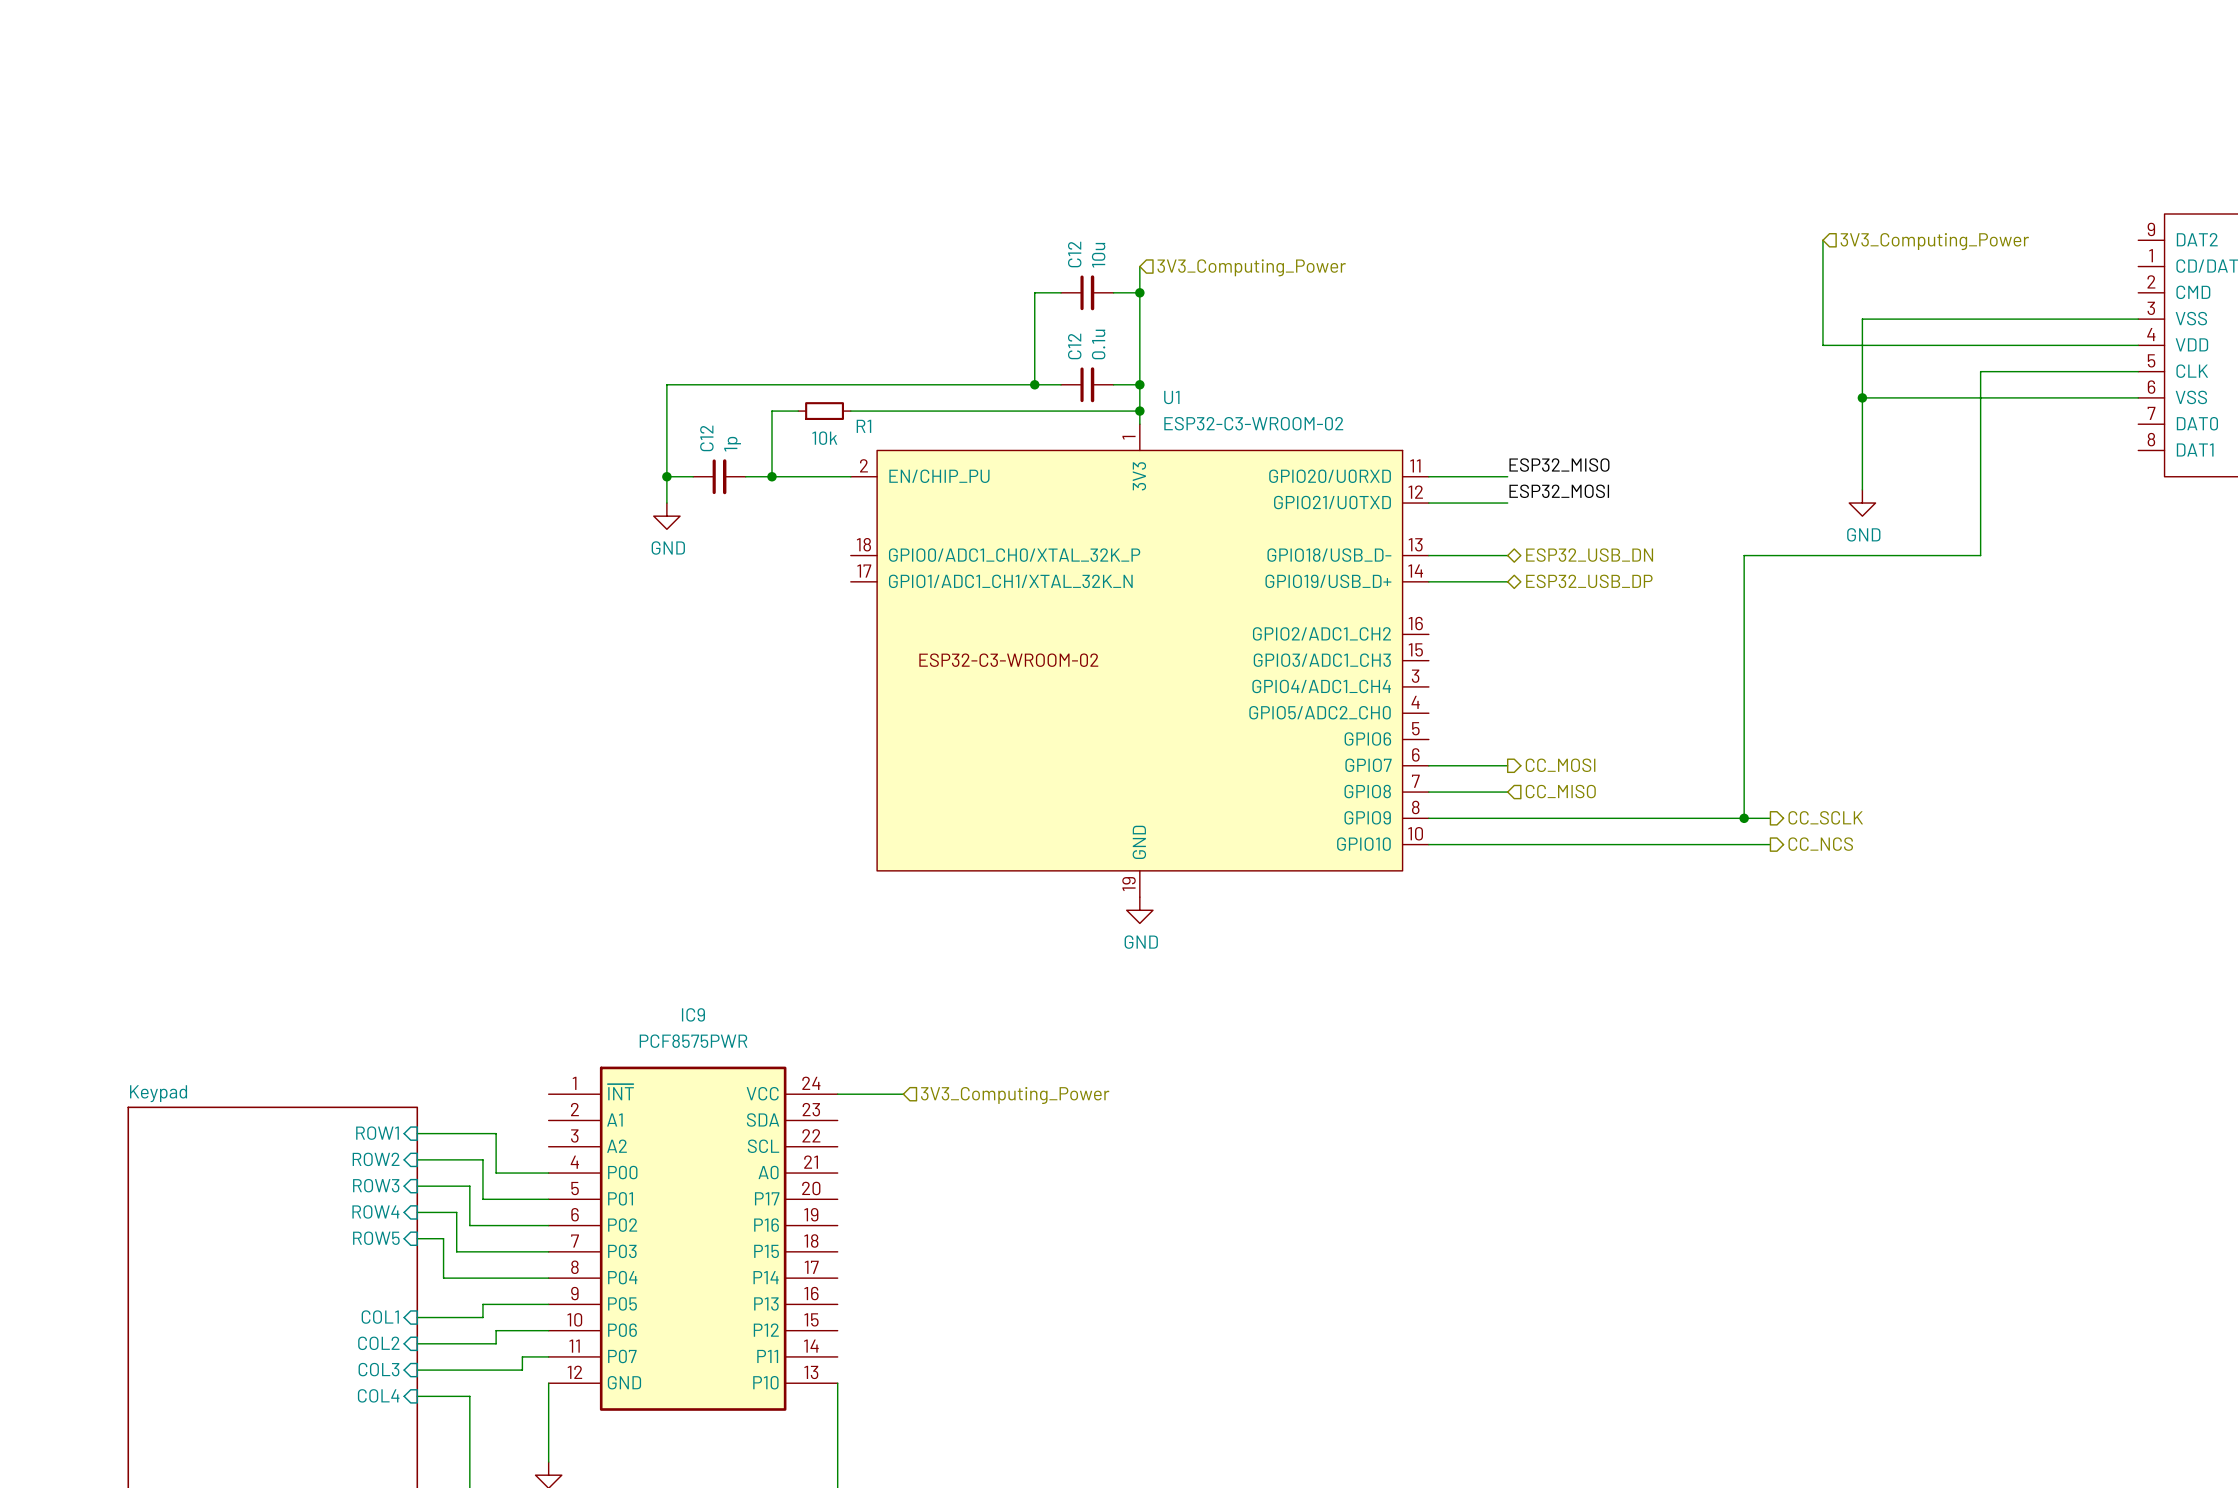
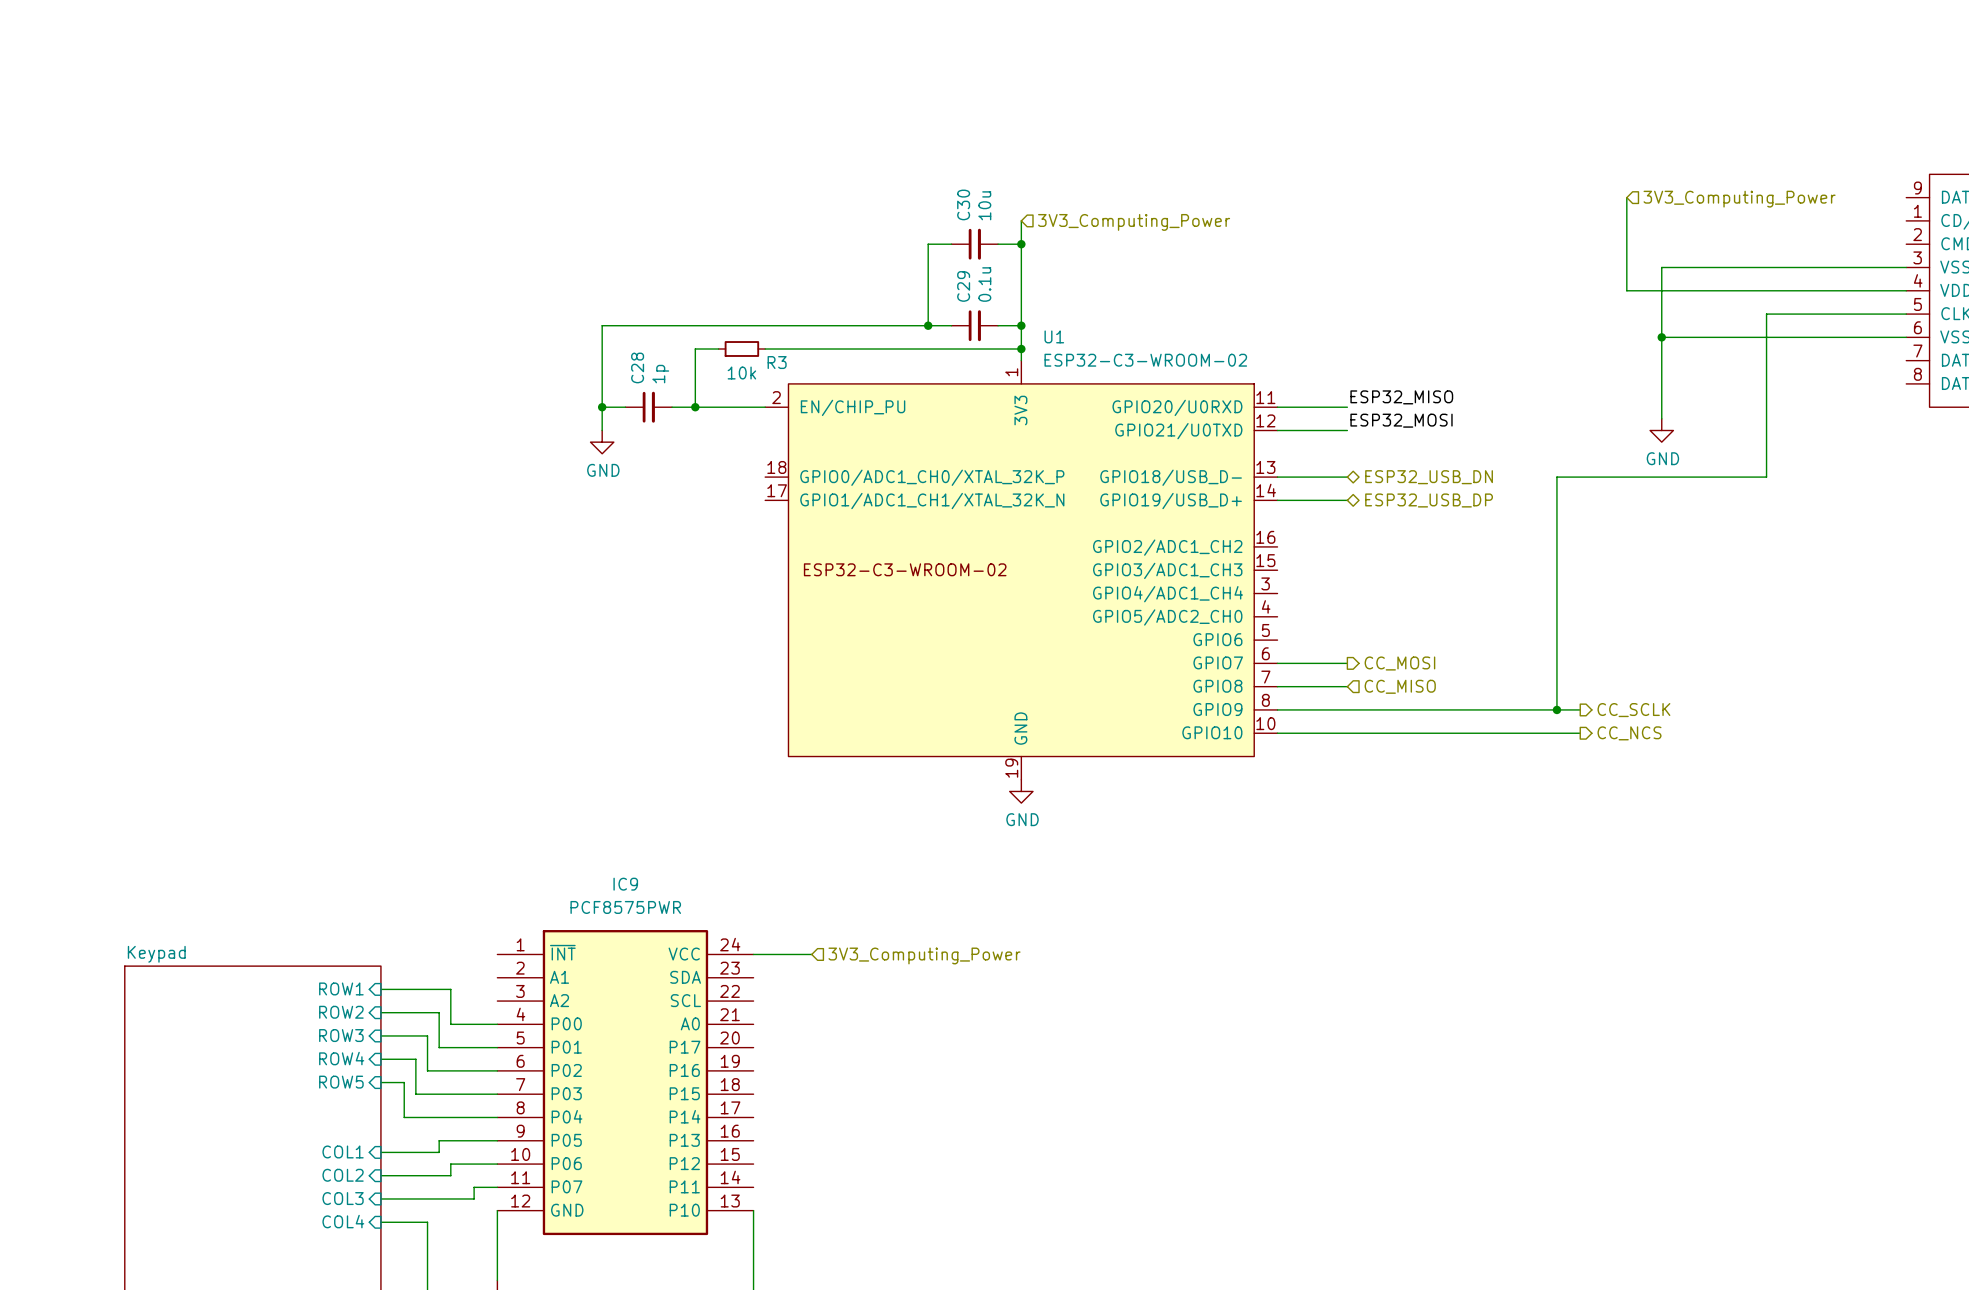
C12 name: C12 (1074, 254) -> C30 (963, 204)
C12 name: C12 (1074, 346) -> C29 (963, 286)
R1 name: R1 (863, 426) -> R3 (777, 362)
C12 name: C12 (706, 438) -> C28 (637, 367)

